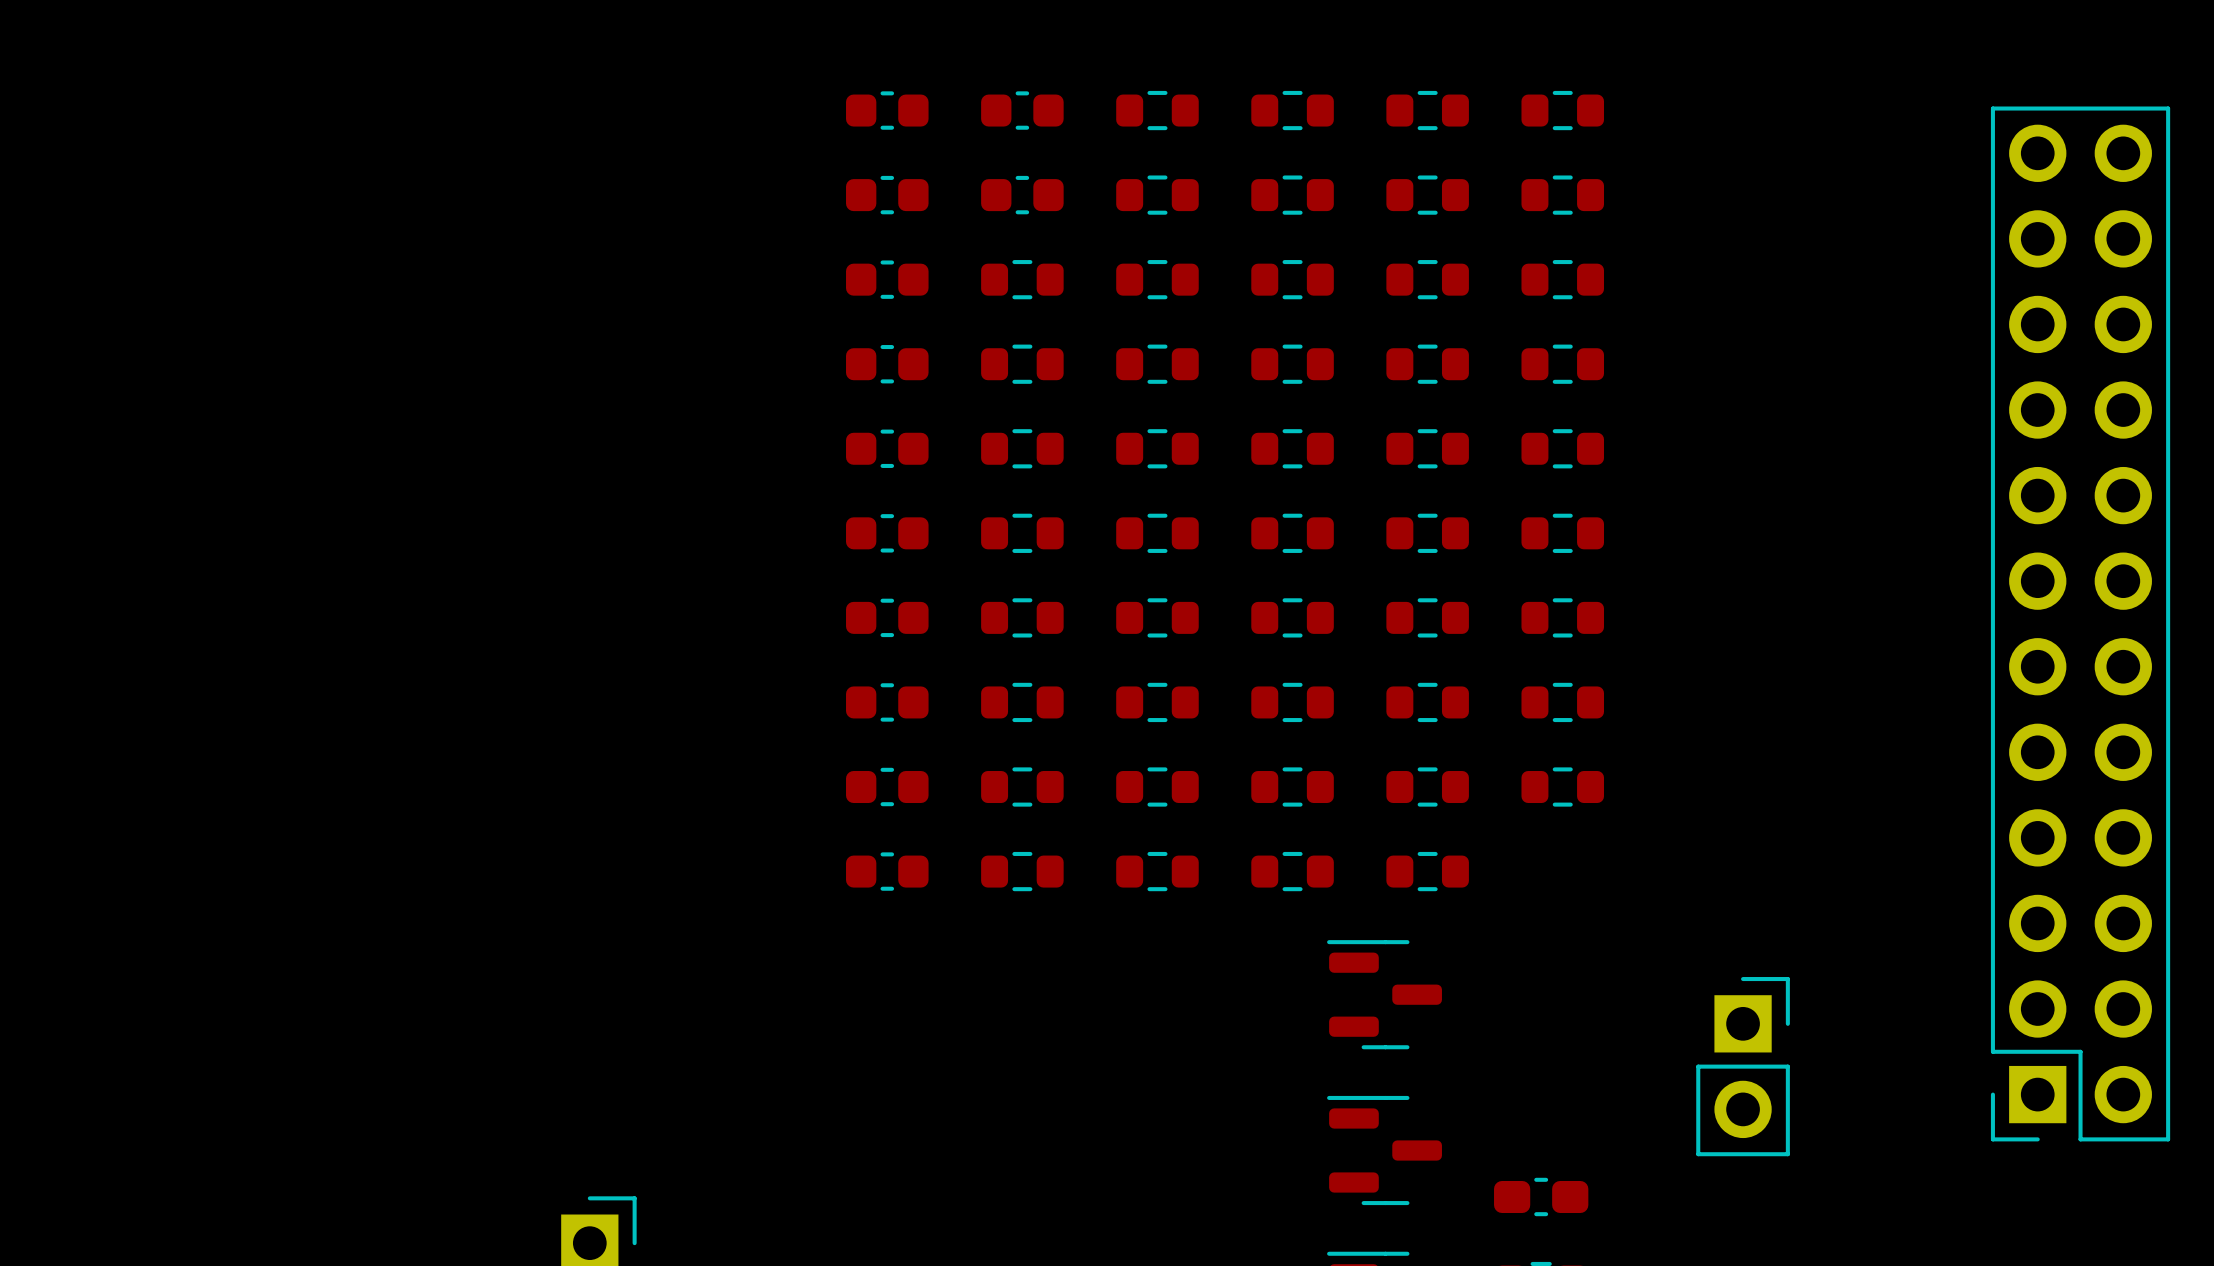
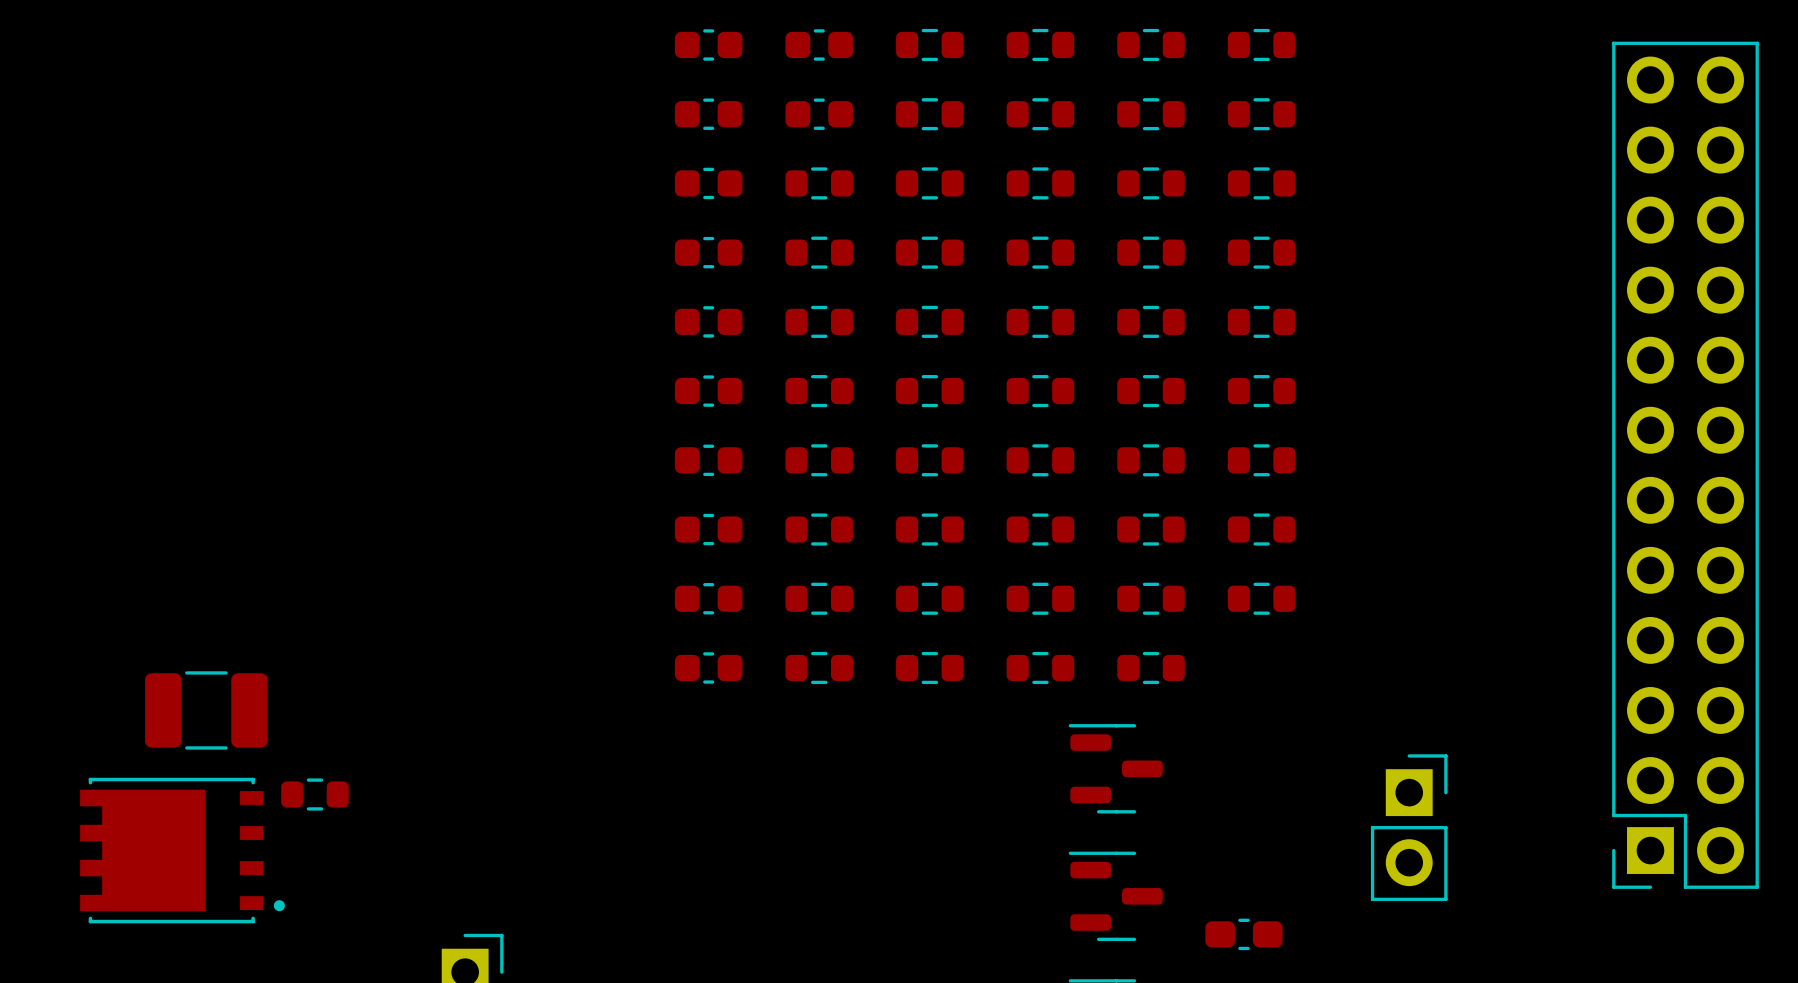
part: none -> (206, 710)
part: none -> (314, 794)
part: none -> (182, 850)

